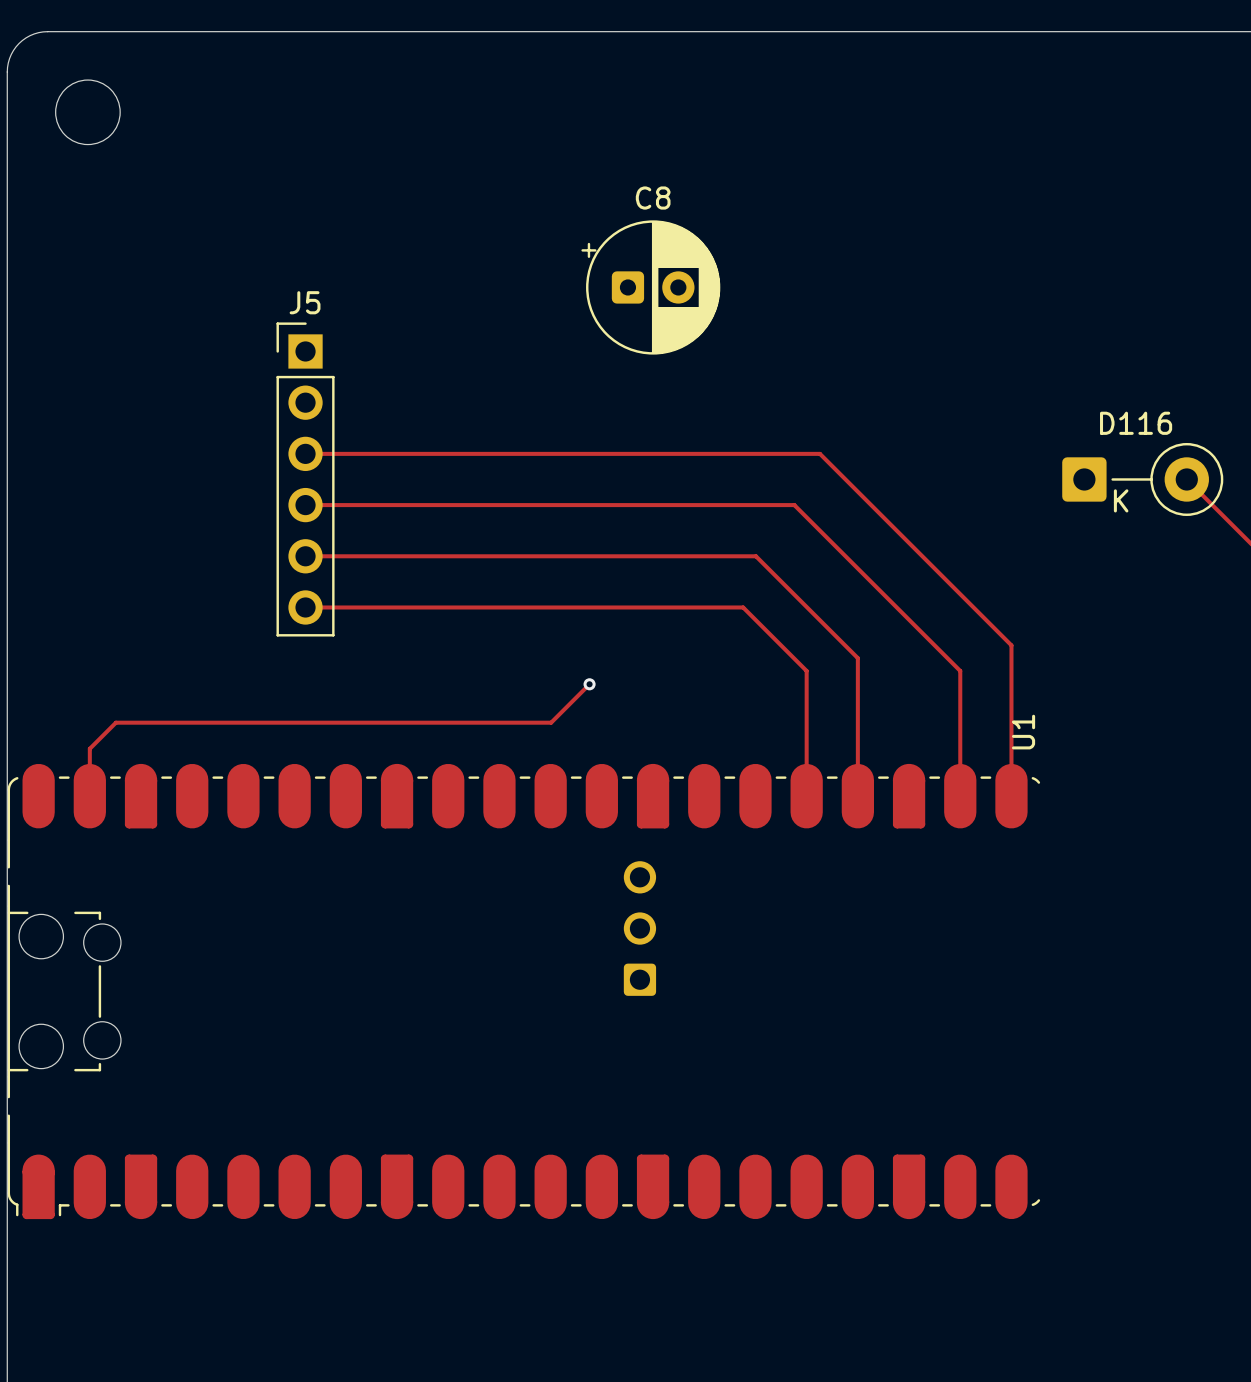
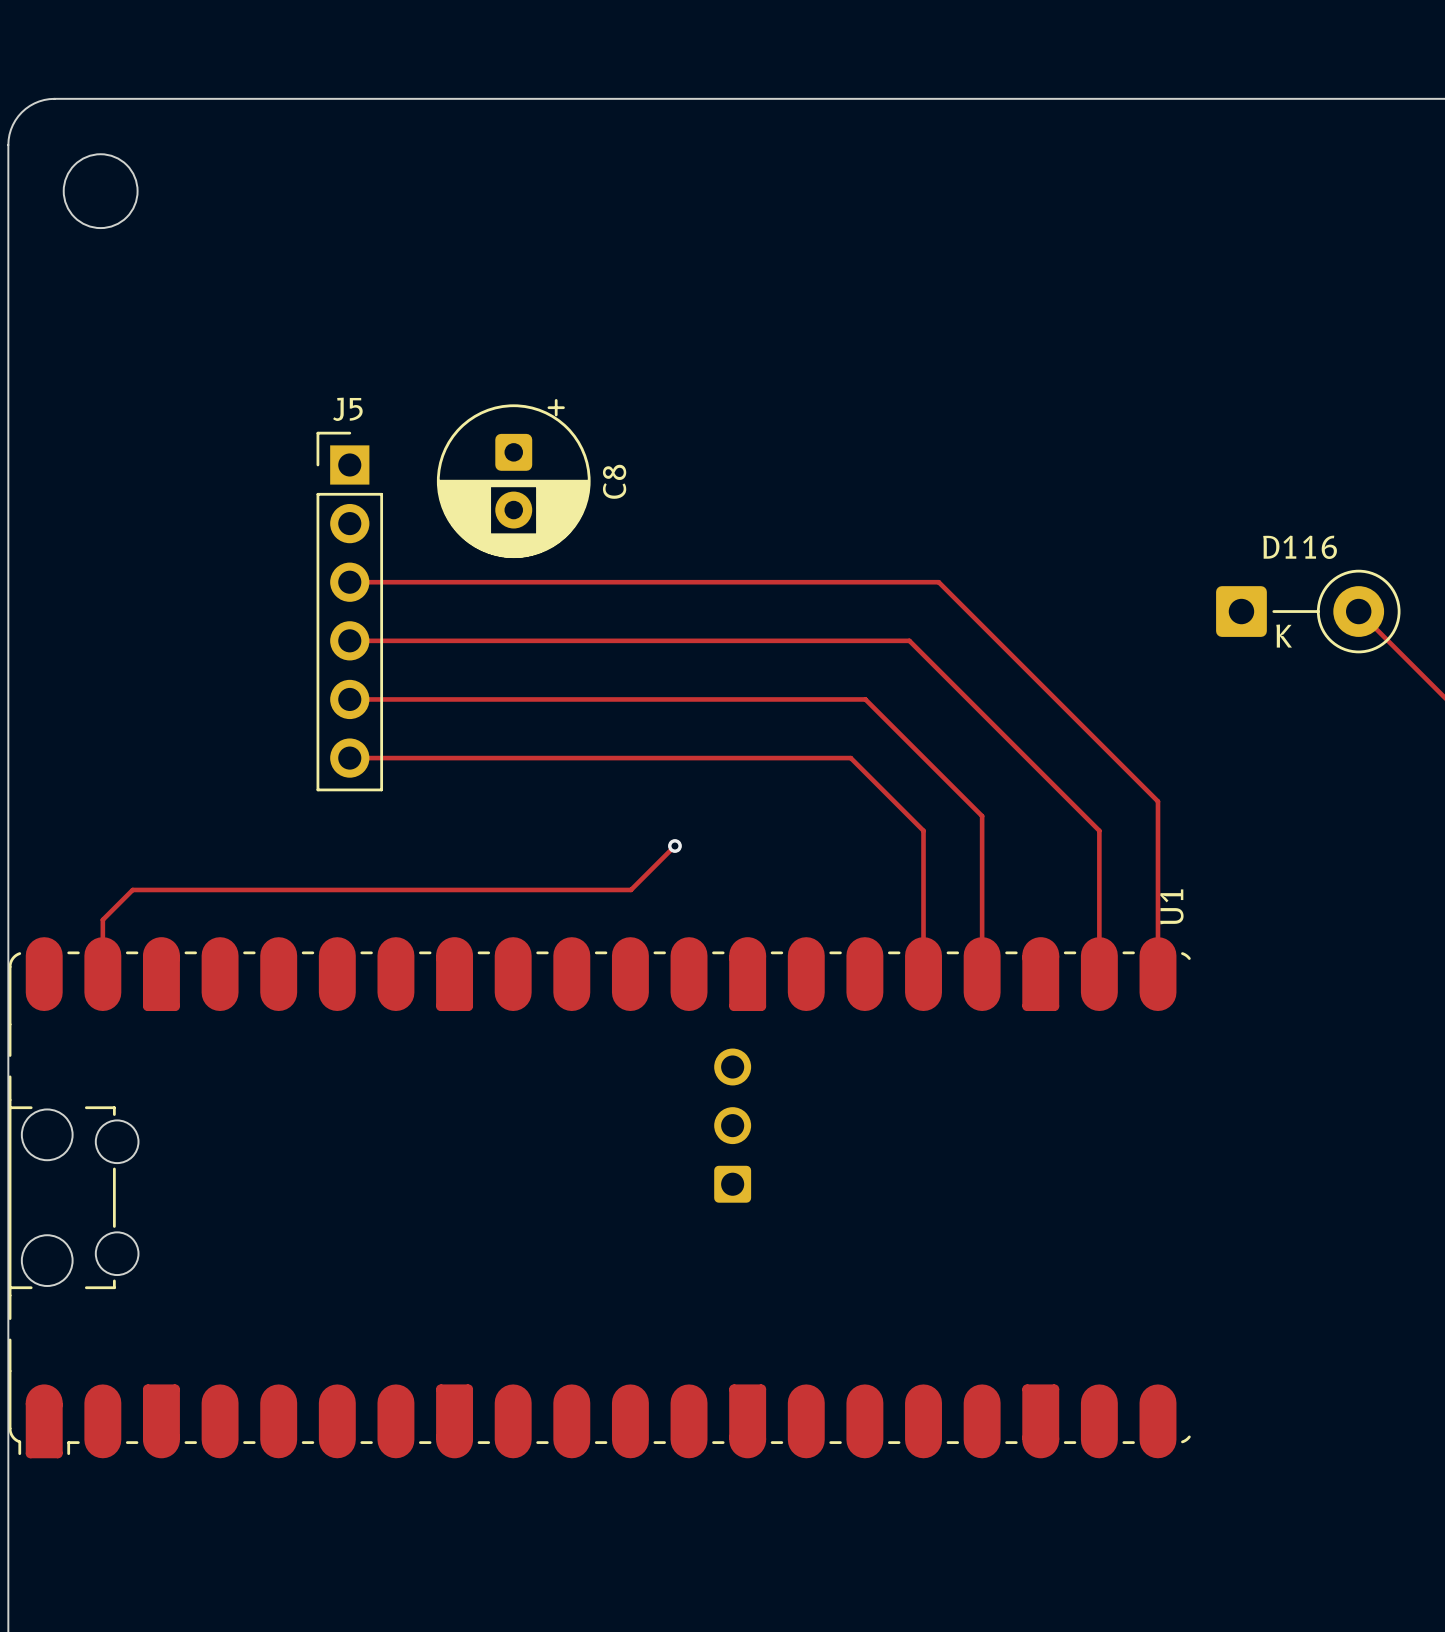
C8 rotation: 0° (650, 287) -> 90° clockwise (513, 478)
C8 position: (650, 287) -> (513, 478)

